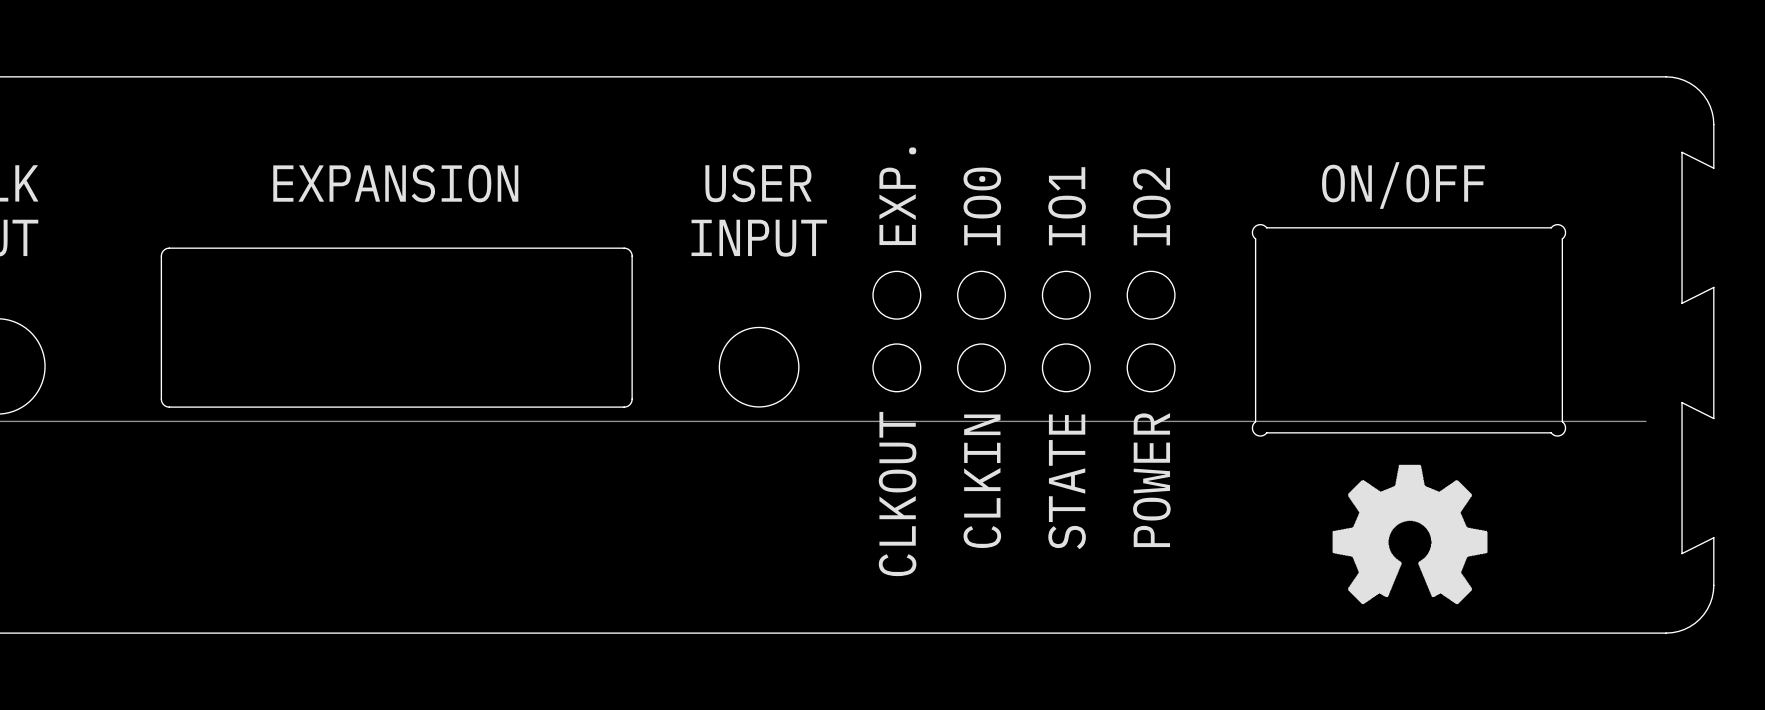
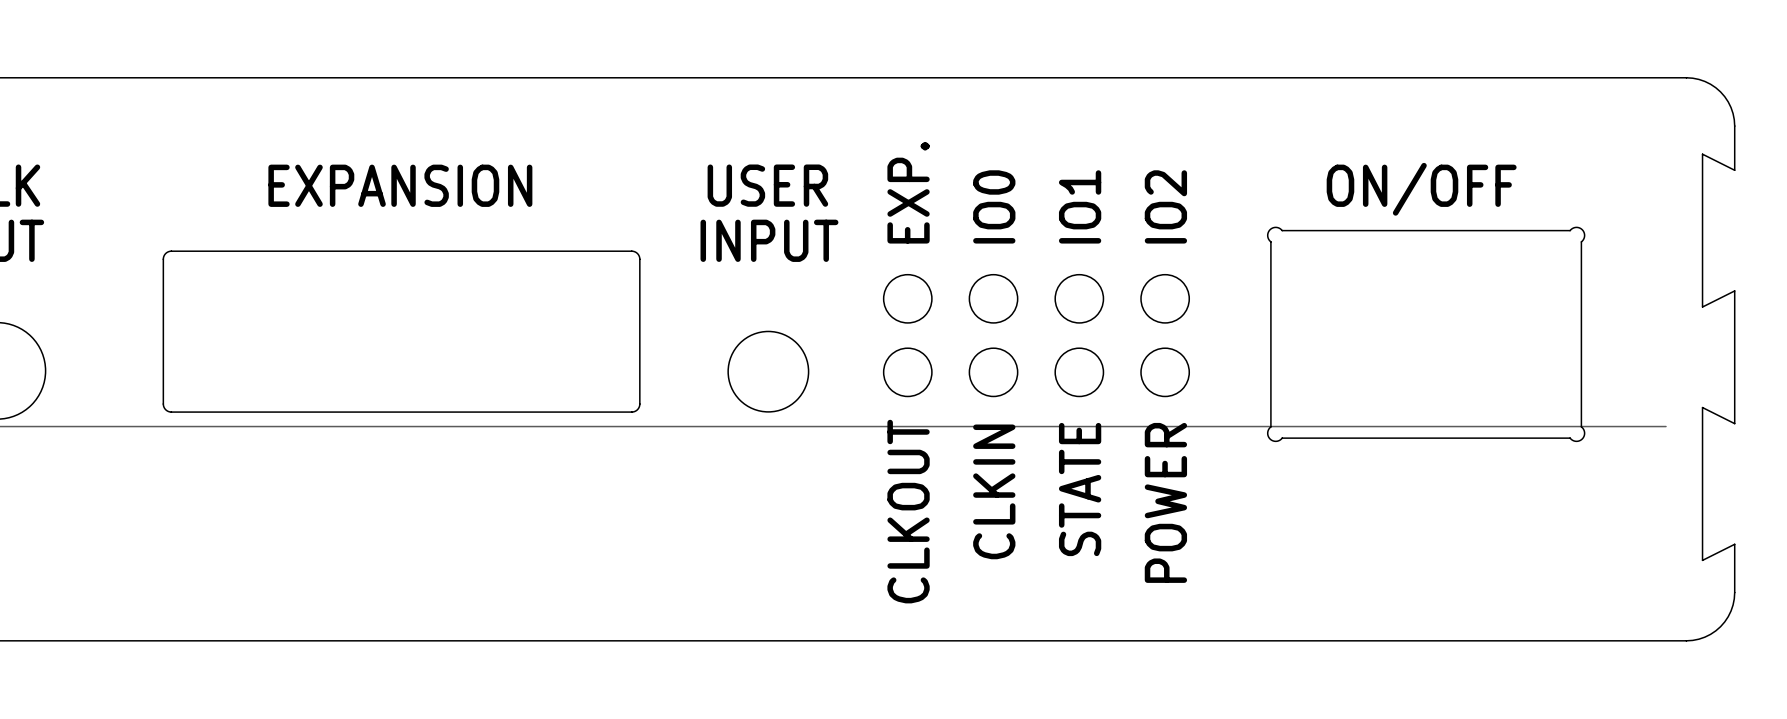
drawing: [1332, 464, 1488, 605] -> none

